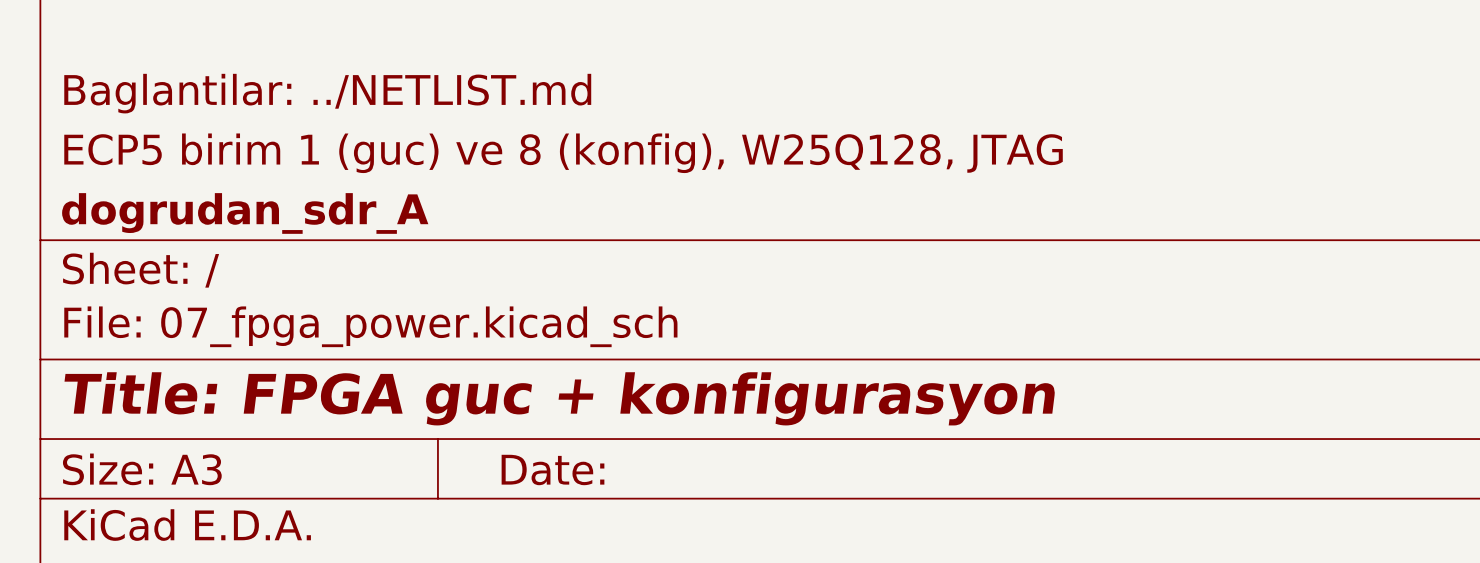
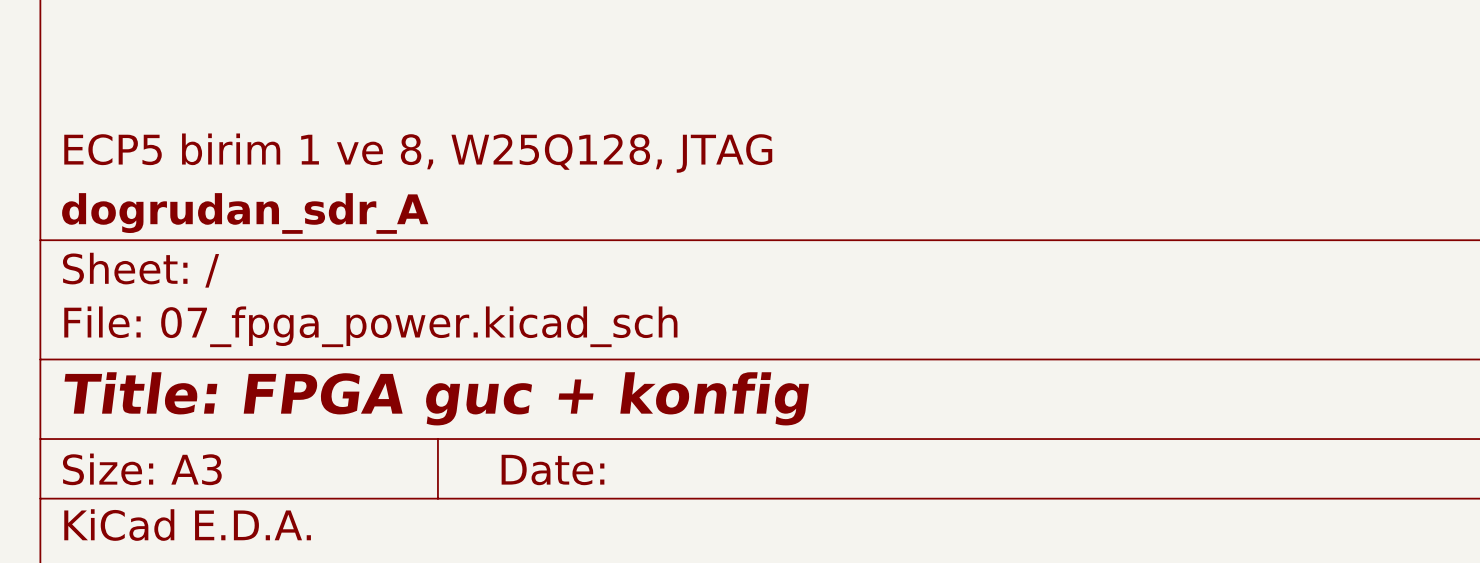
title block: Baglantilar: ../NETLIST.md (327, 93) -> none
title block: ECP5 birim 1 (guc) ve 8 (konfig), W25Q128, JTAG (563, 153) -> ECP5 birim 1 ve 8, W25Q128, JTAG (418, 153)
title block: Title: FPGA guc + konfigurasyon (559, 398) -> Title: FPGA guc + konfig (436, 398)

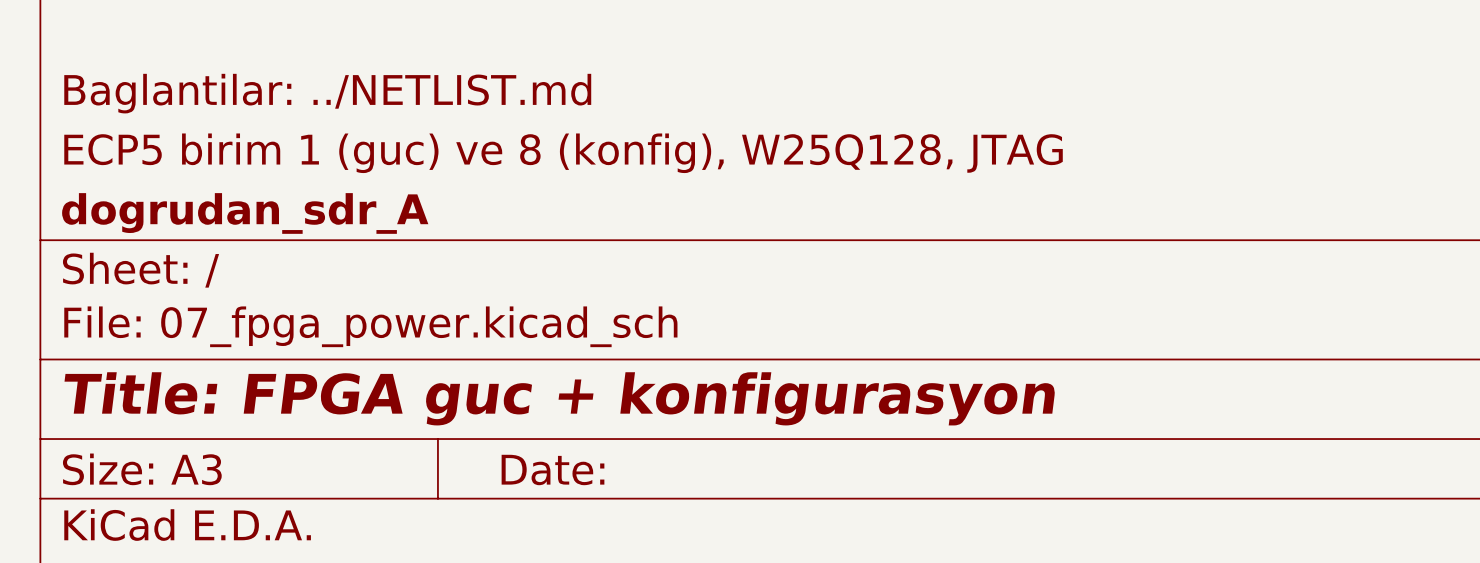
title block: none -> Baglantilar: ../NETLIST.md (327, 93)
title block: ECP5 birim 1 ve 8, W25Q128, JTAG (418, 153) -> ECP5 birim 1 (guc) ve 8 (konfig), W25Q128, JTAG (563, 153)
title block: Title: FPGA guc + konfig (436, 398) -> Title: FPGA guc + konfigurasyon (559, 398)

